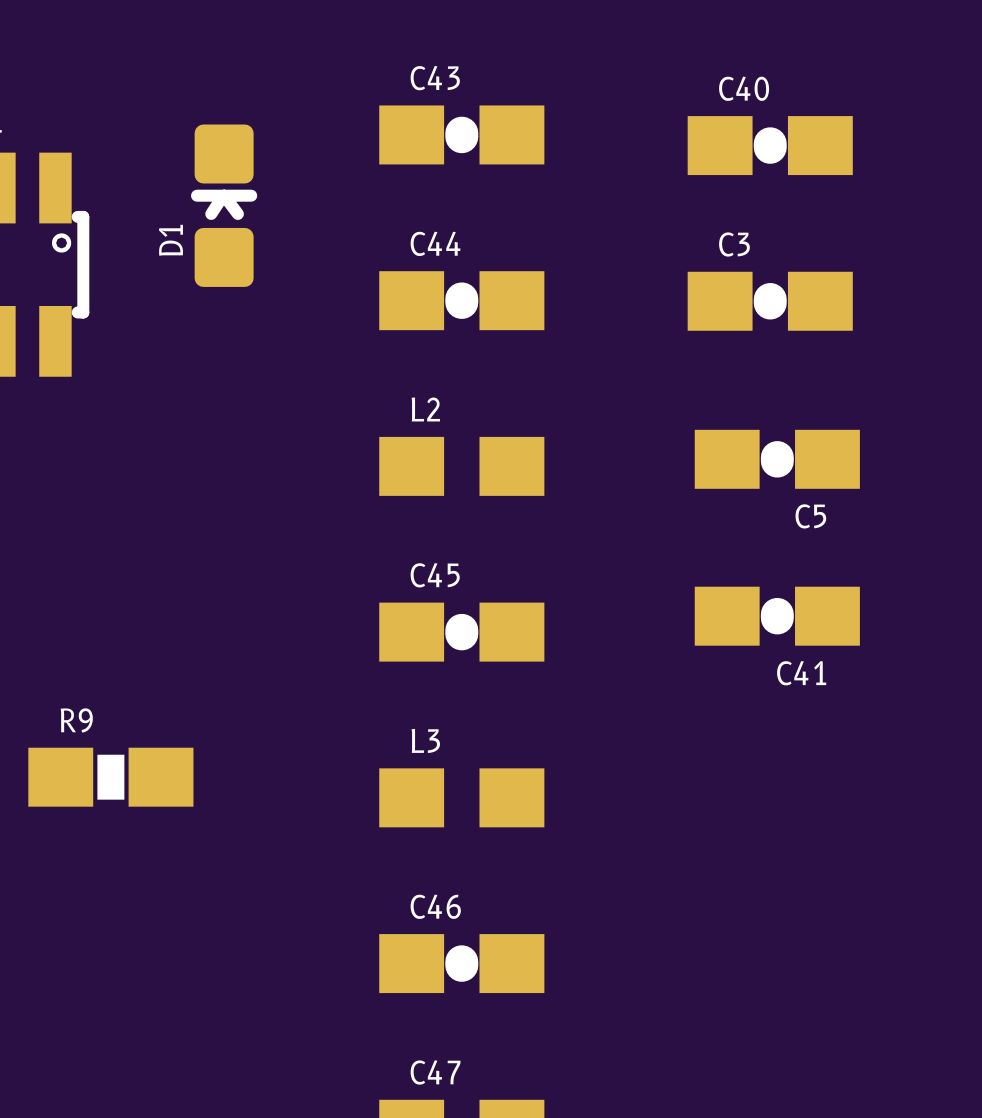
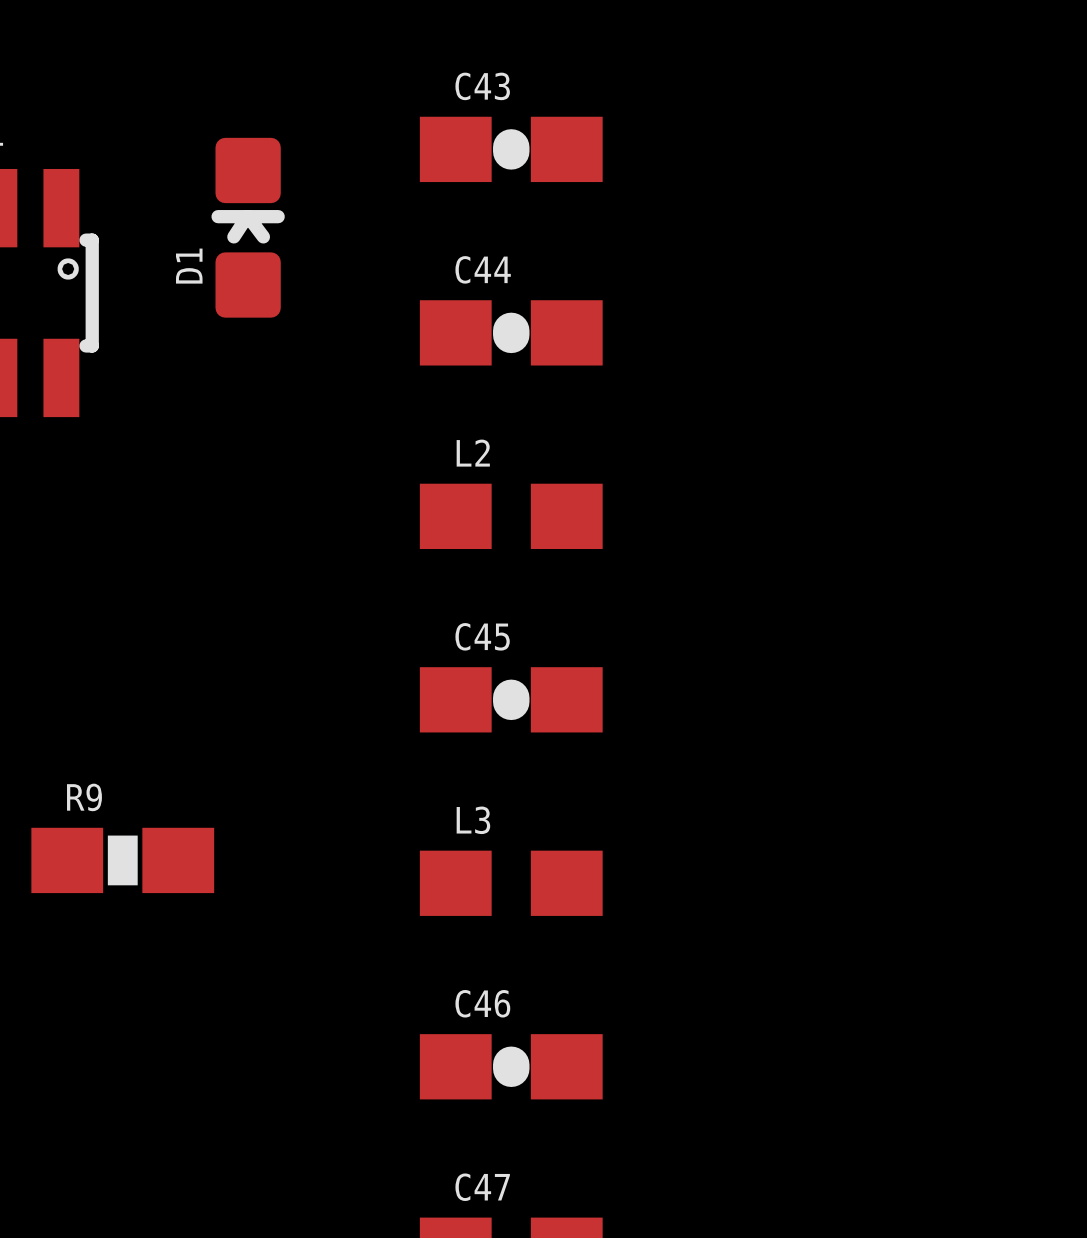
C40: (770, 145) -> none
C3: (770, 301) -> none
C5: (777, 459) -> none
C41: (777, 616) -> none

